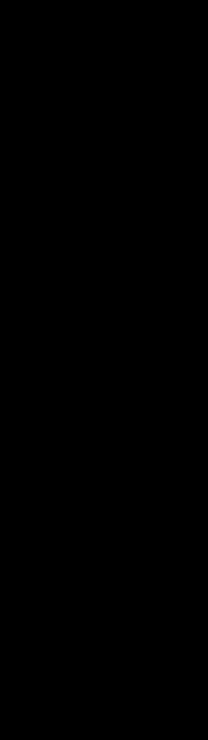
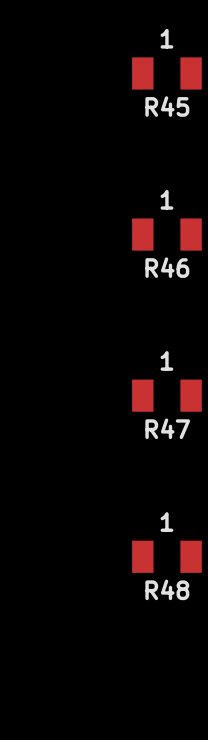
R45: none -> 1 (166, 73)
R46: none -> 1 (166, 234)
R47: none -> 1 (166, 395)
R48: none -> 1 (166, 556)

